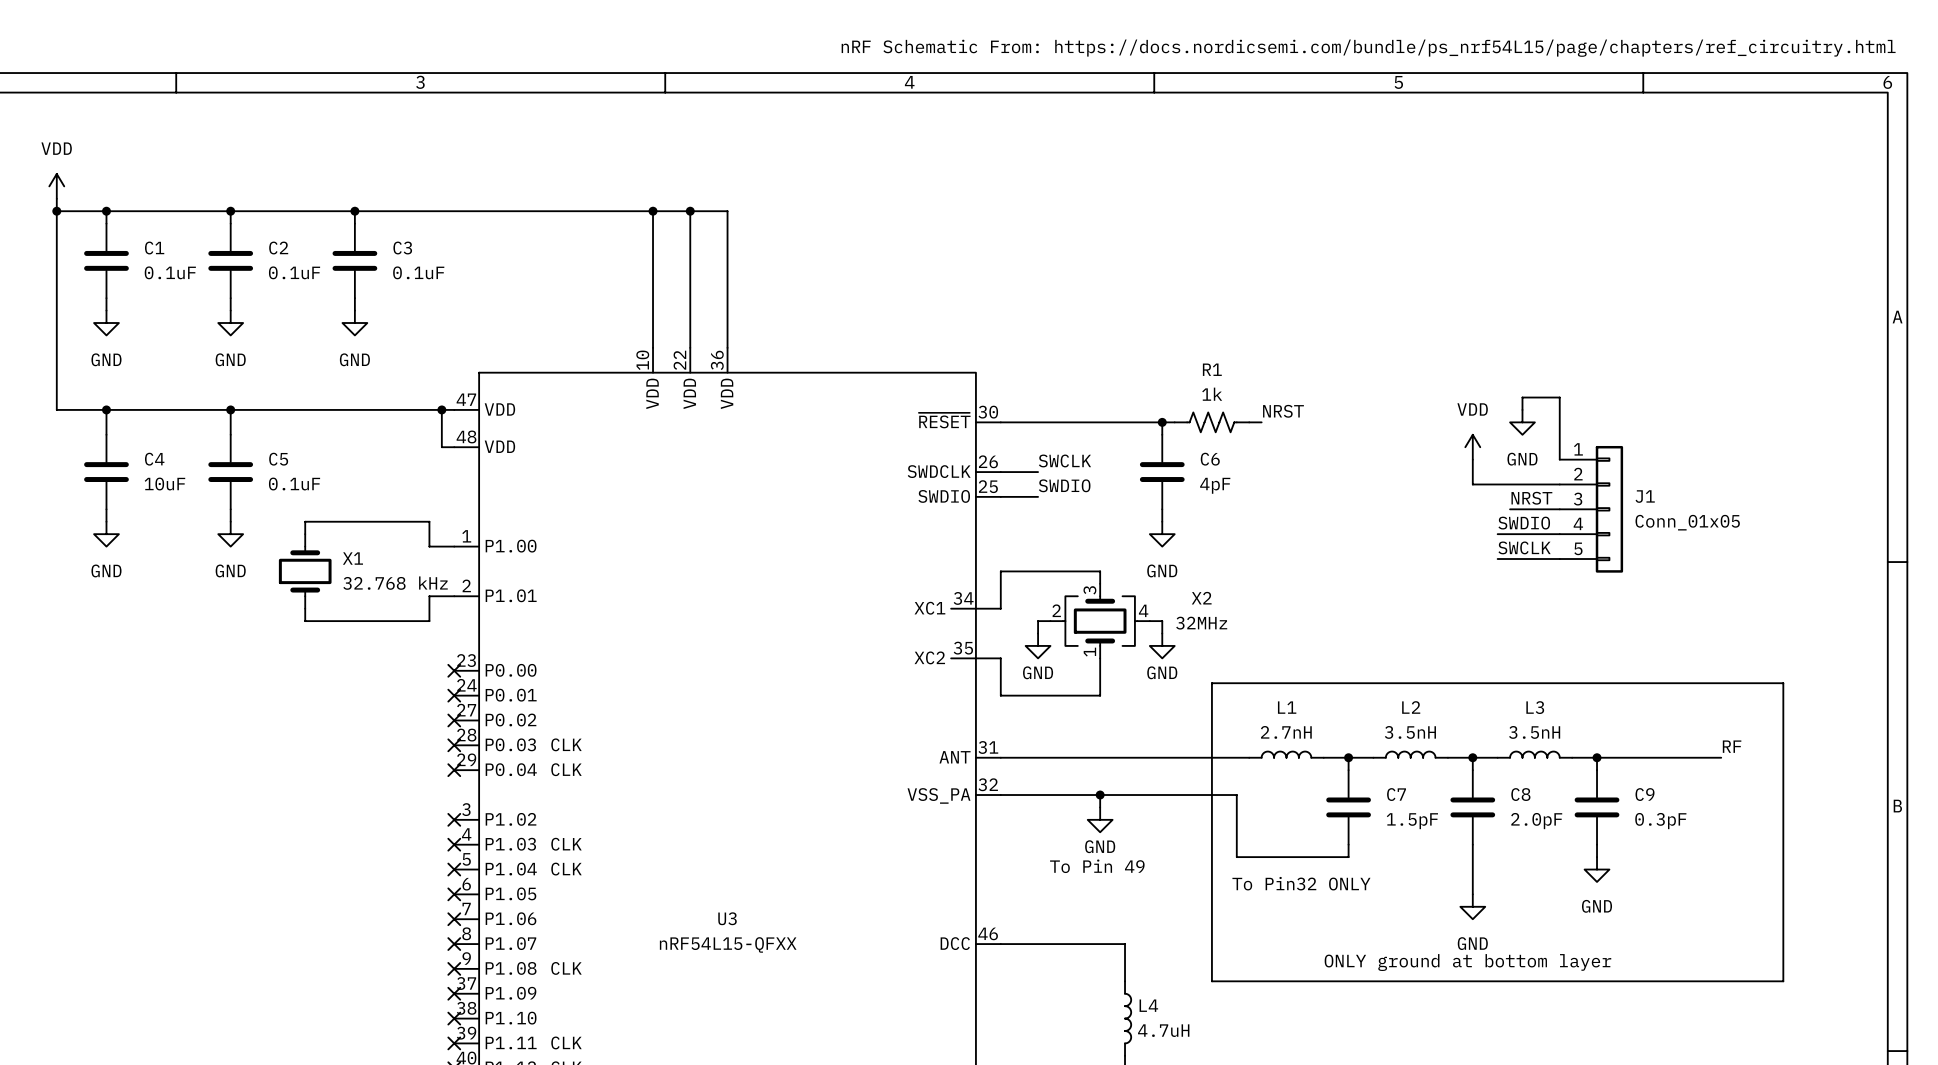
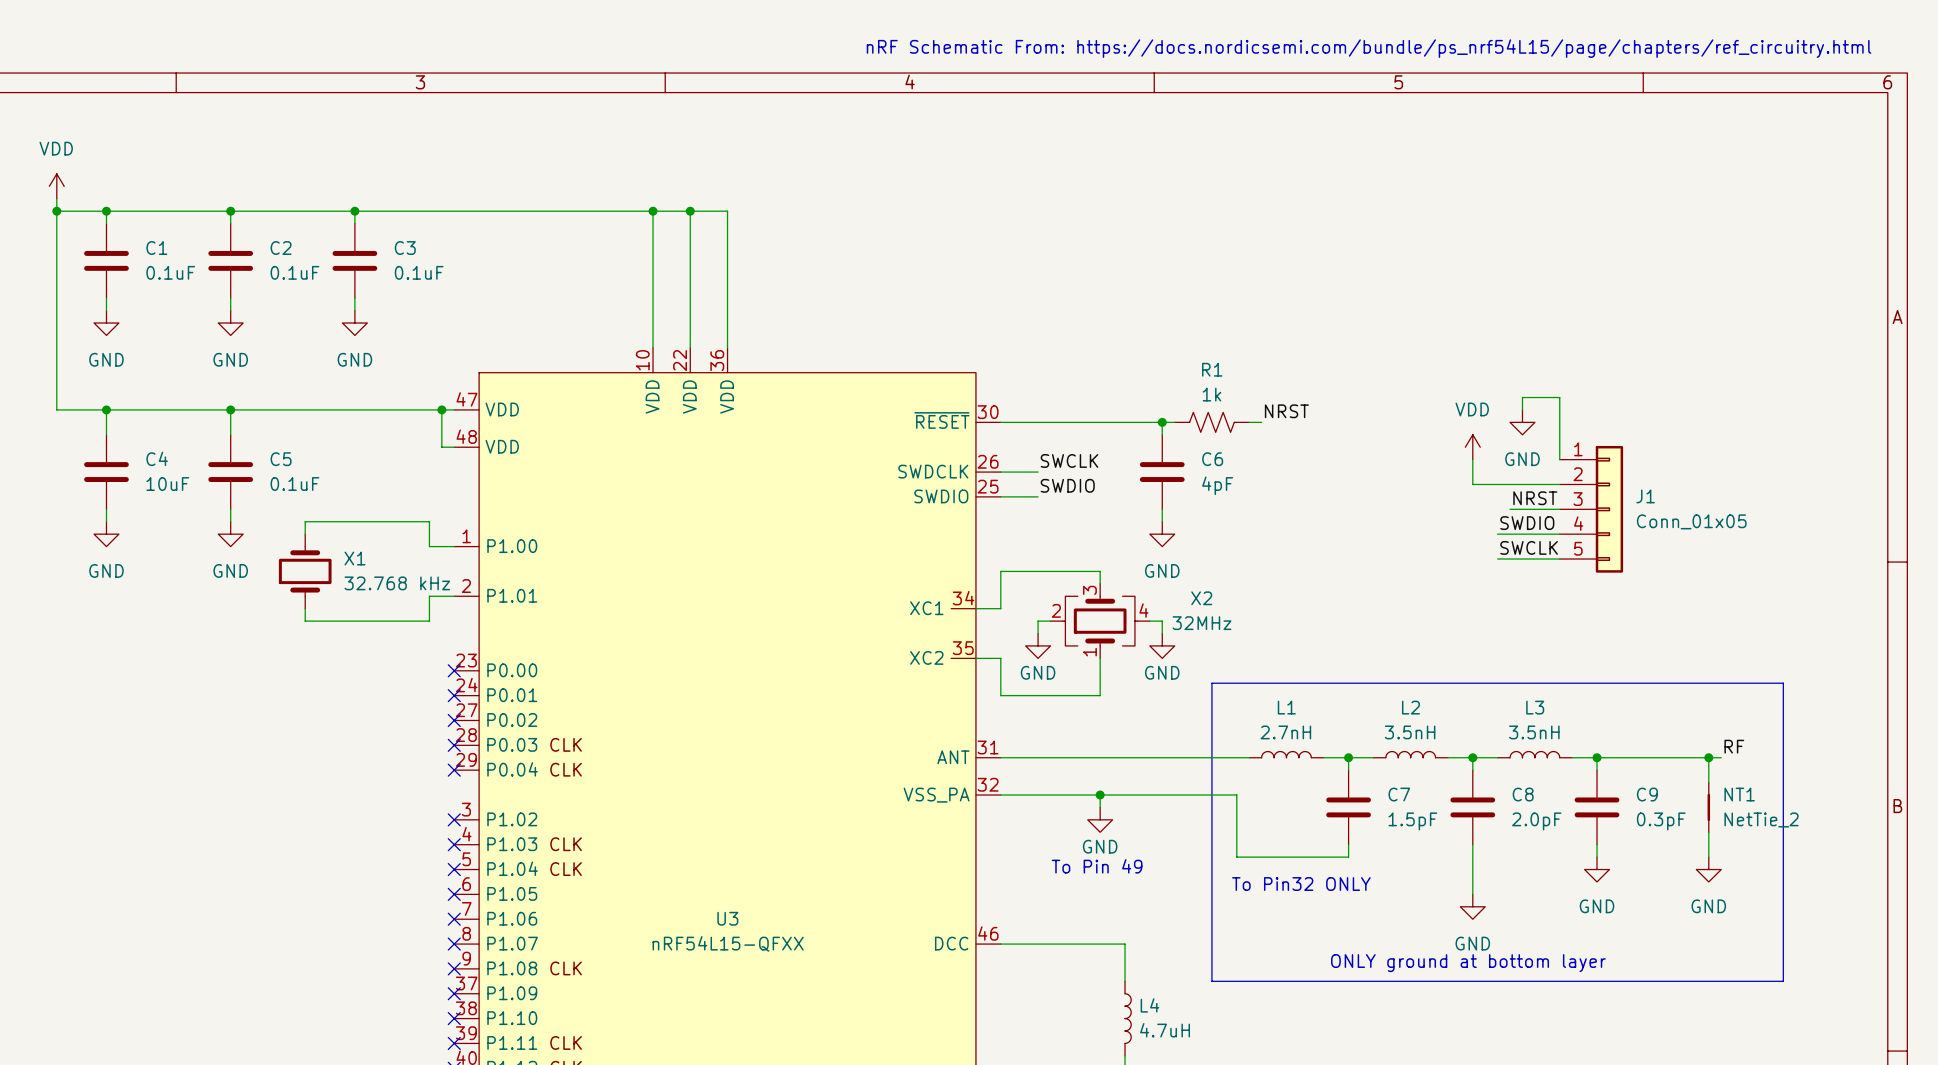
wire: none -> (1708, 757) (1708, 782)
junction: none -> (1708, 757)
NT1: none -> NetTie_2 (1708, 807)
wire: none -> (1708, 832) (1708, 857)
power symbol: none -> GND (1708, 869)

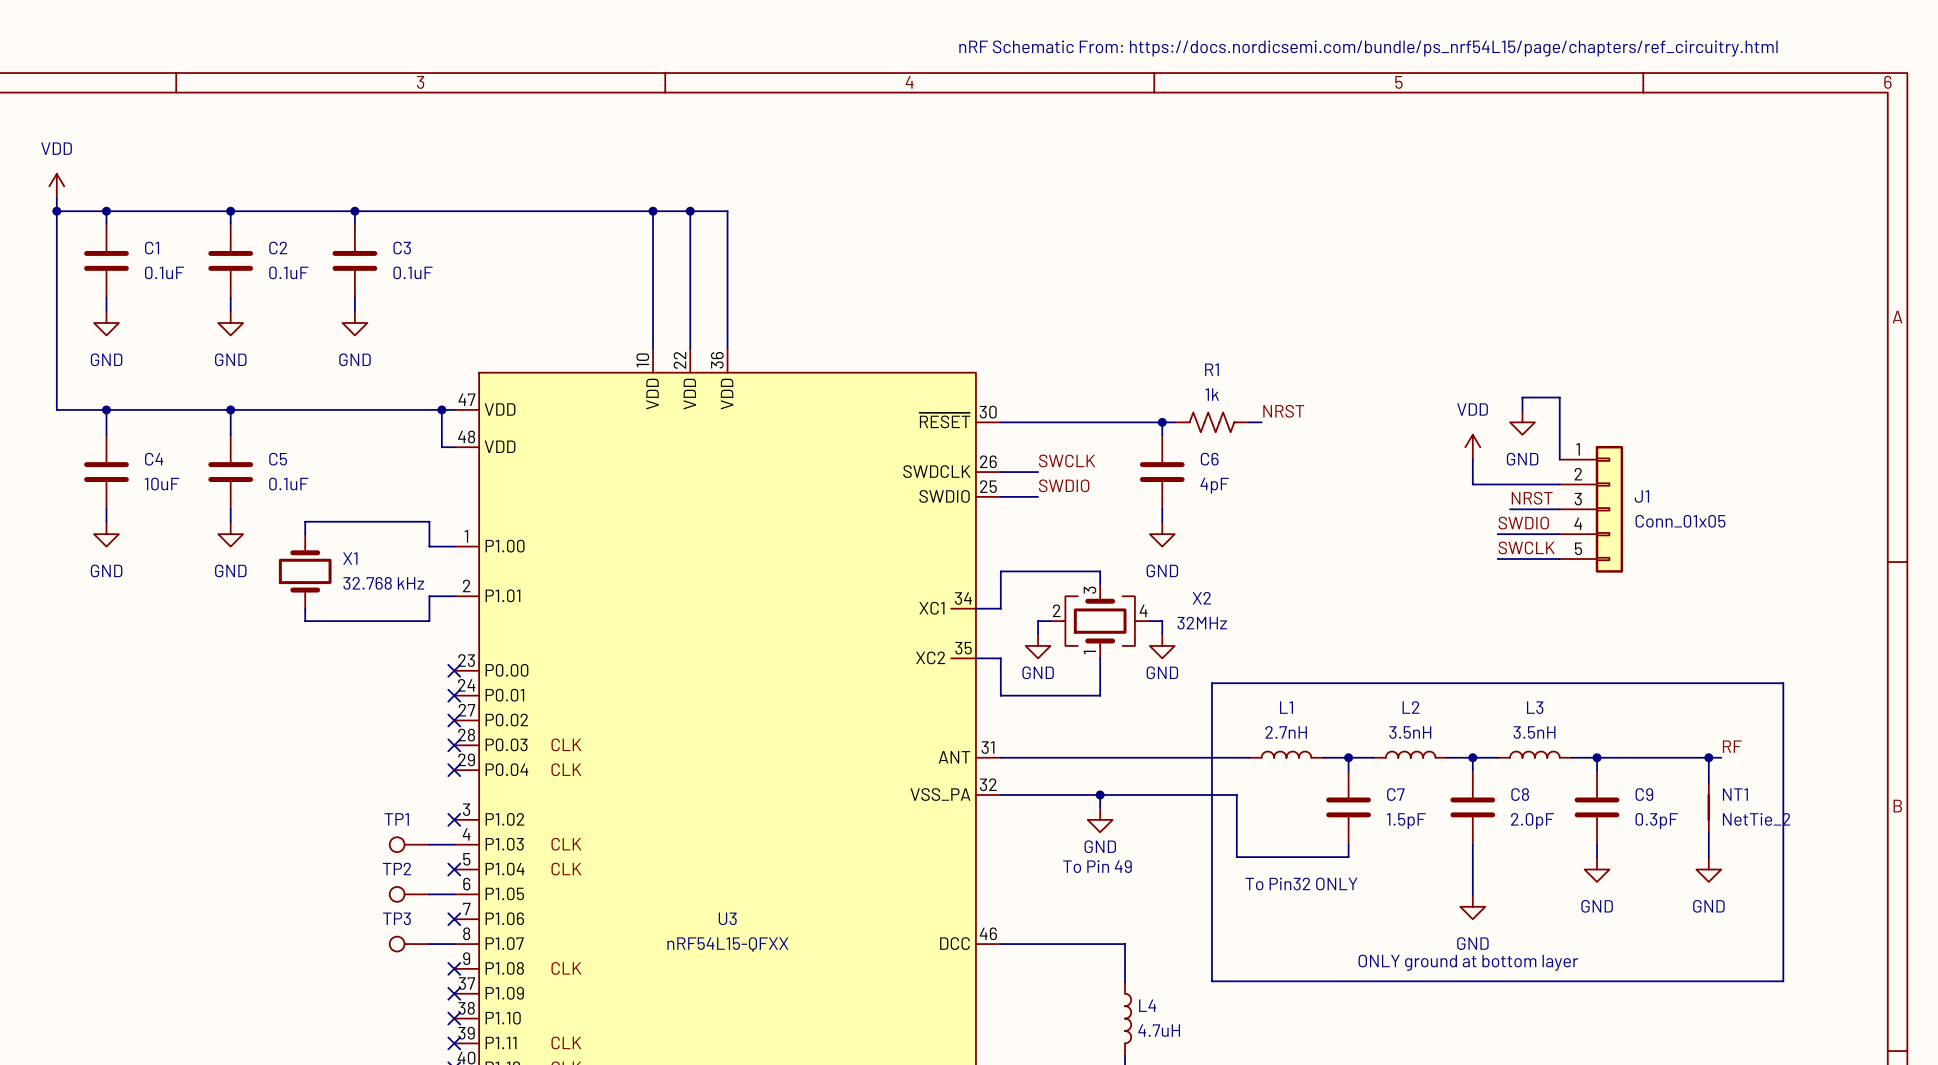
TP1: none -> (409, 844)
wire: none -> (429, 844) (454, 844)
no-connect mark: (454, 844) -> none
TP2: none -> (409, 894)
wire: none -> (429, 894) (454, 894)
no-connect mark: (454, 894) -> none
TP3: none -> (409, 944)
wire: none -> (429, 944) (454, 944)
no-connect mark: (454, 944) -> none

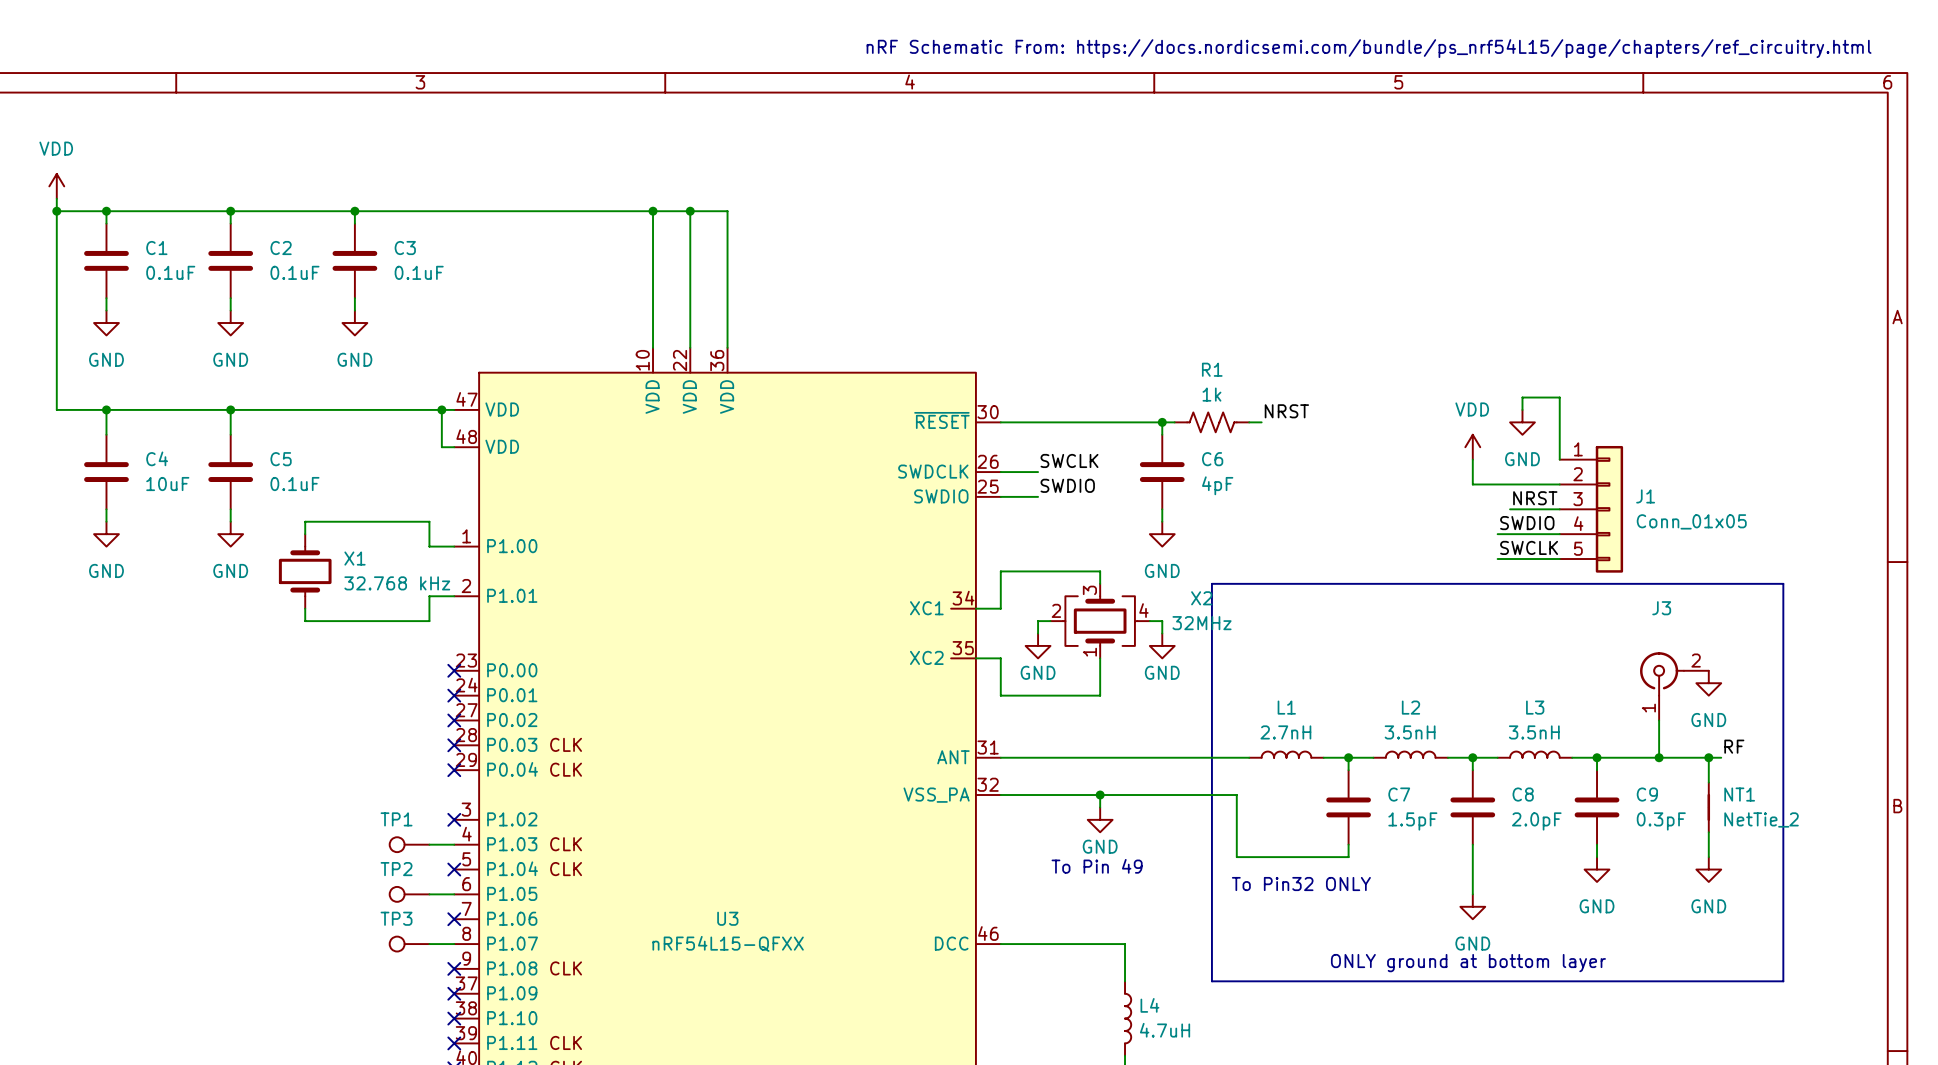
line: (1211, 683) (1783, 683) -> (1211, 683) (1211, 583) (1783, 583) (1783, 683)
power symbol: none -> GND (1708, 683)
J3: none -> (1674, 686)
wire: none -> (1659, 720) (1659, 757)
junction: none -> (1659, 757)

